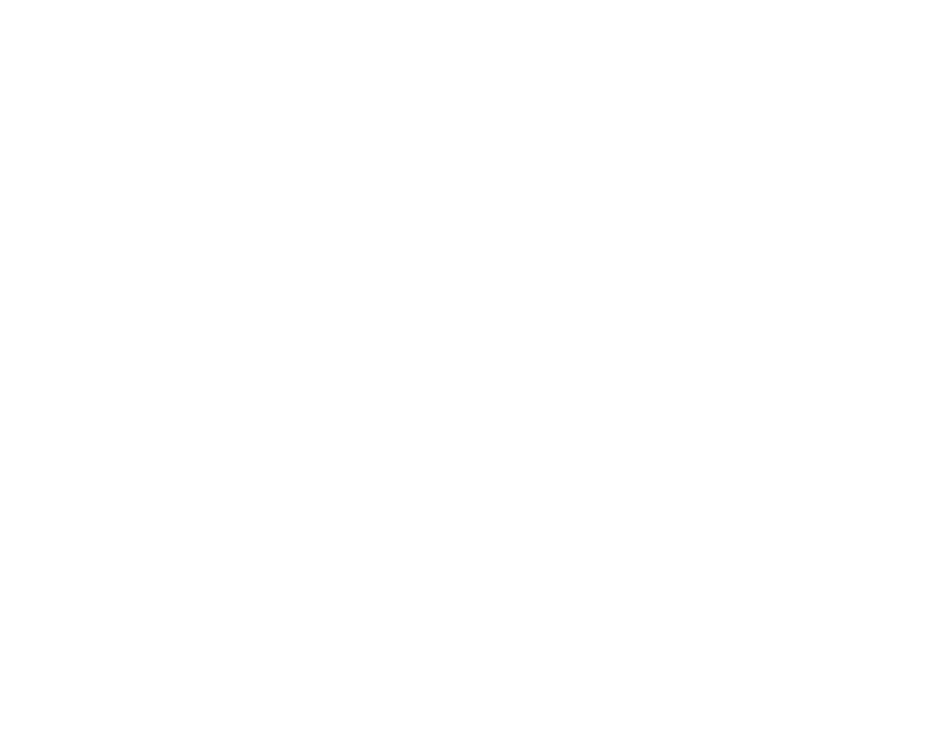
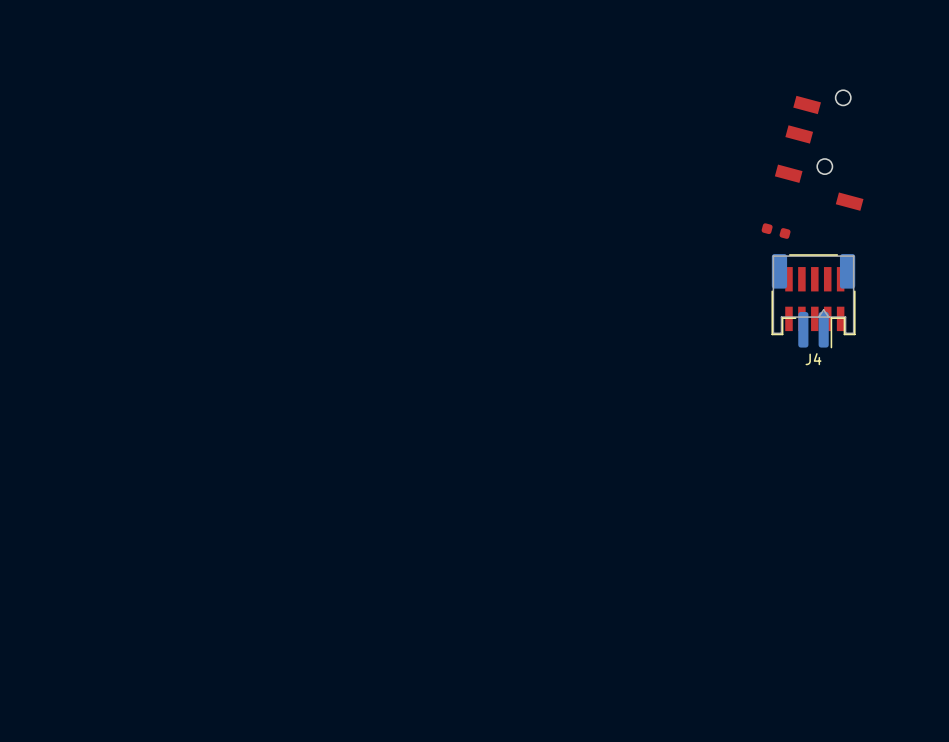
part: none -> (819, 150)
part: none -> (776, 231)
part: none -> (814, 299)
J4: none -> (813, 301)

